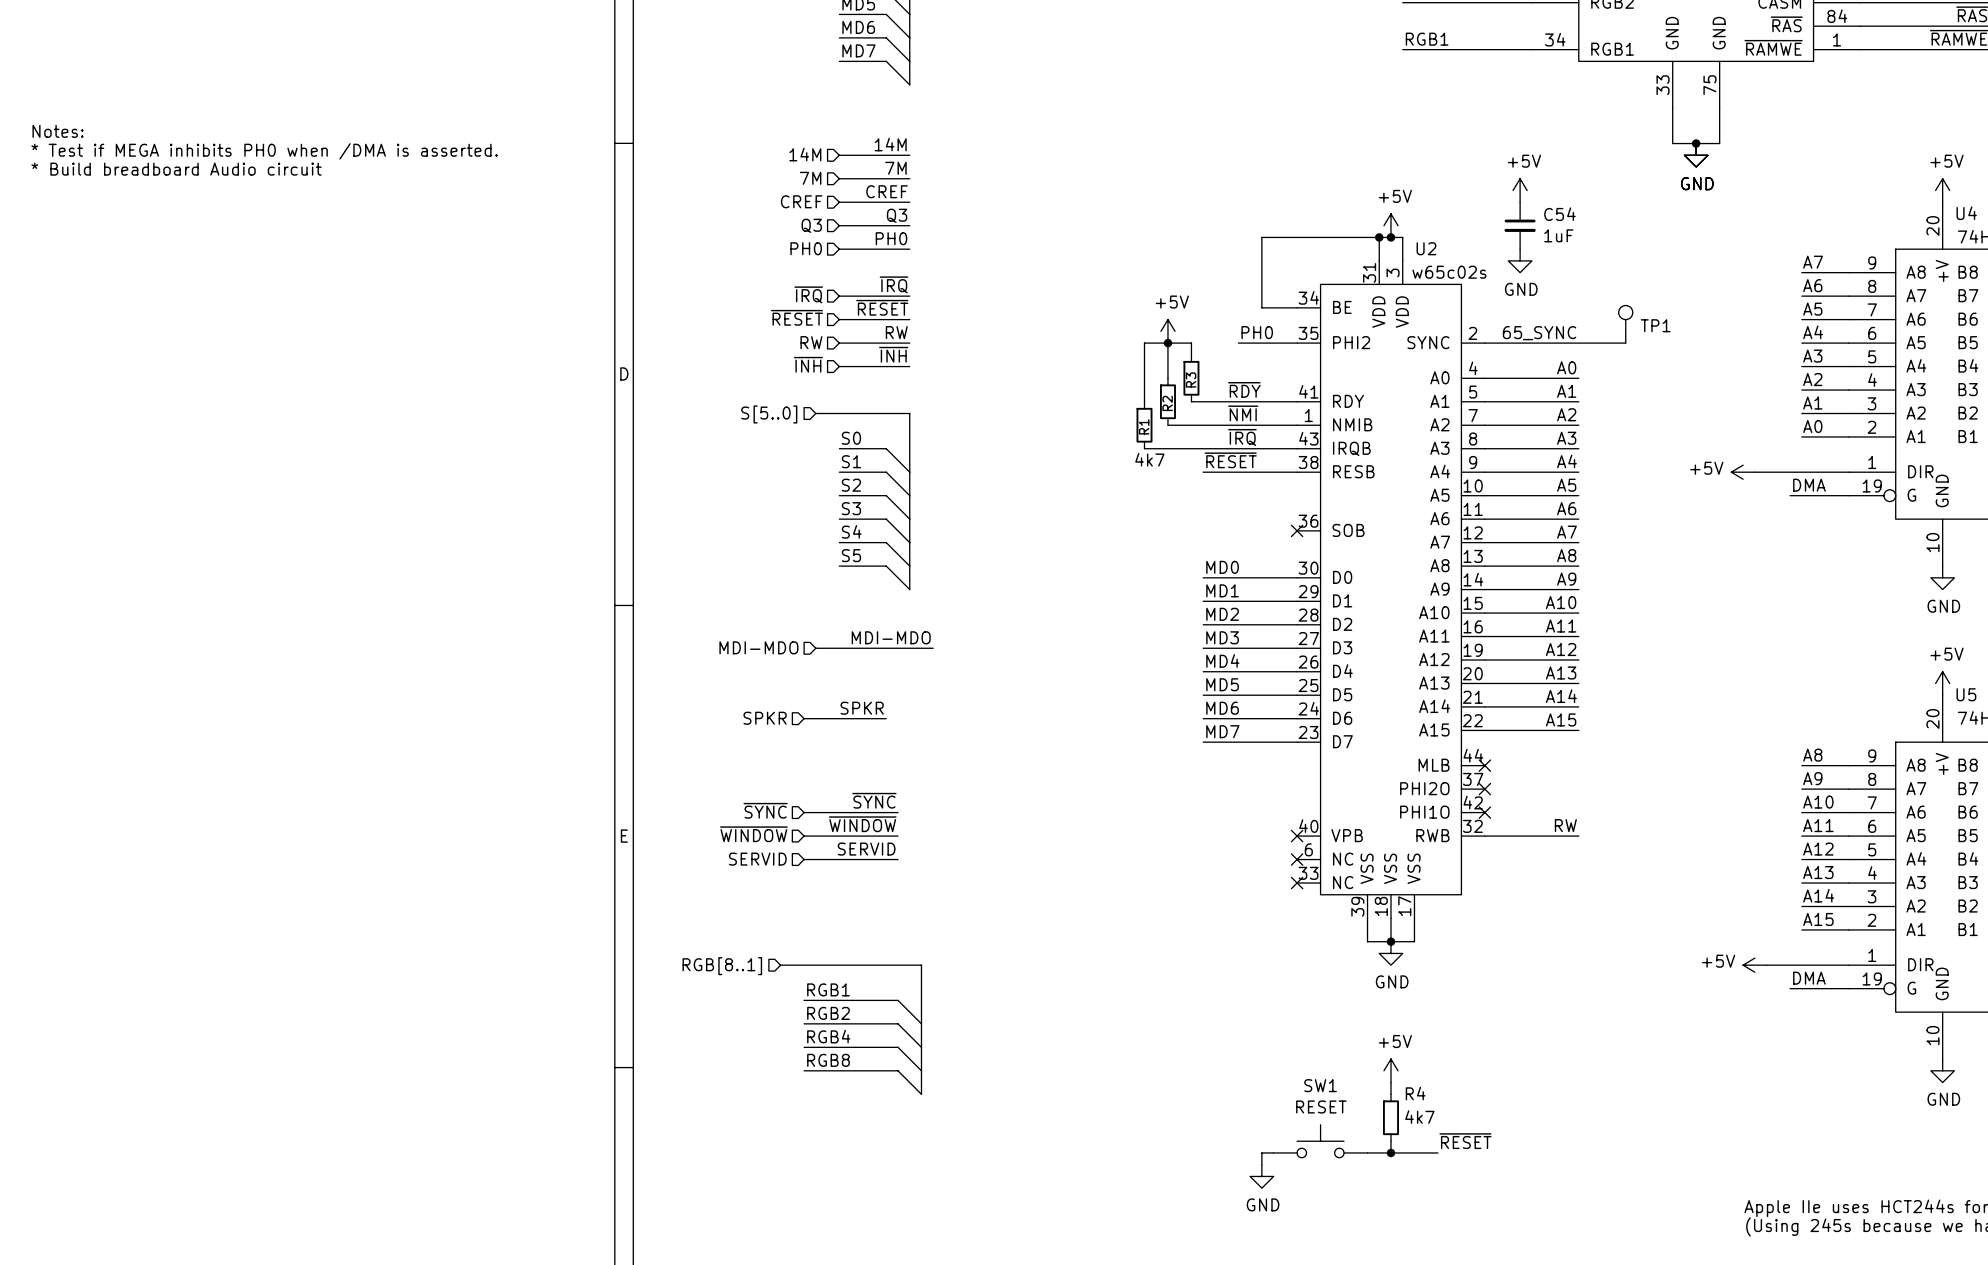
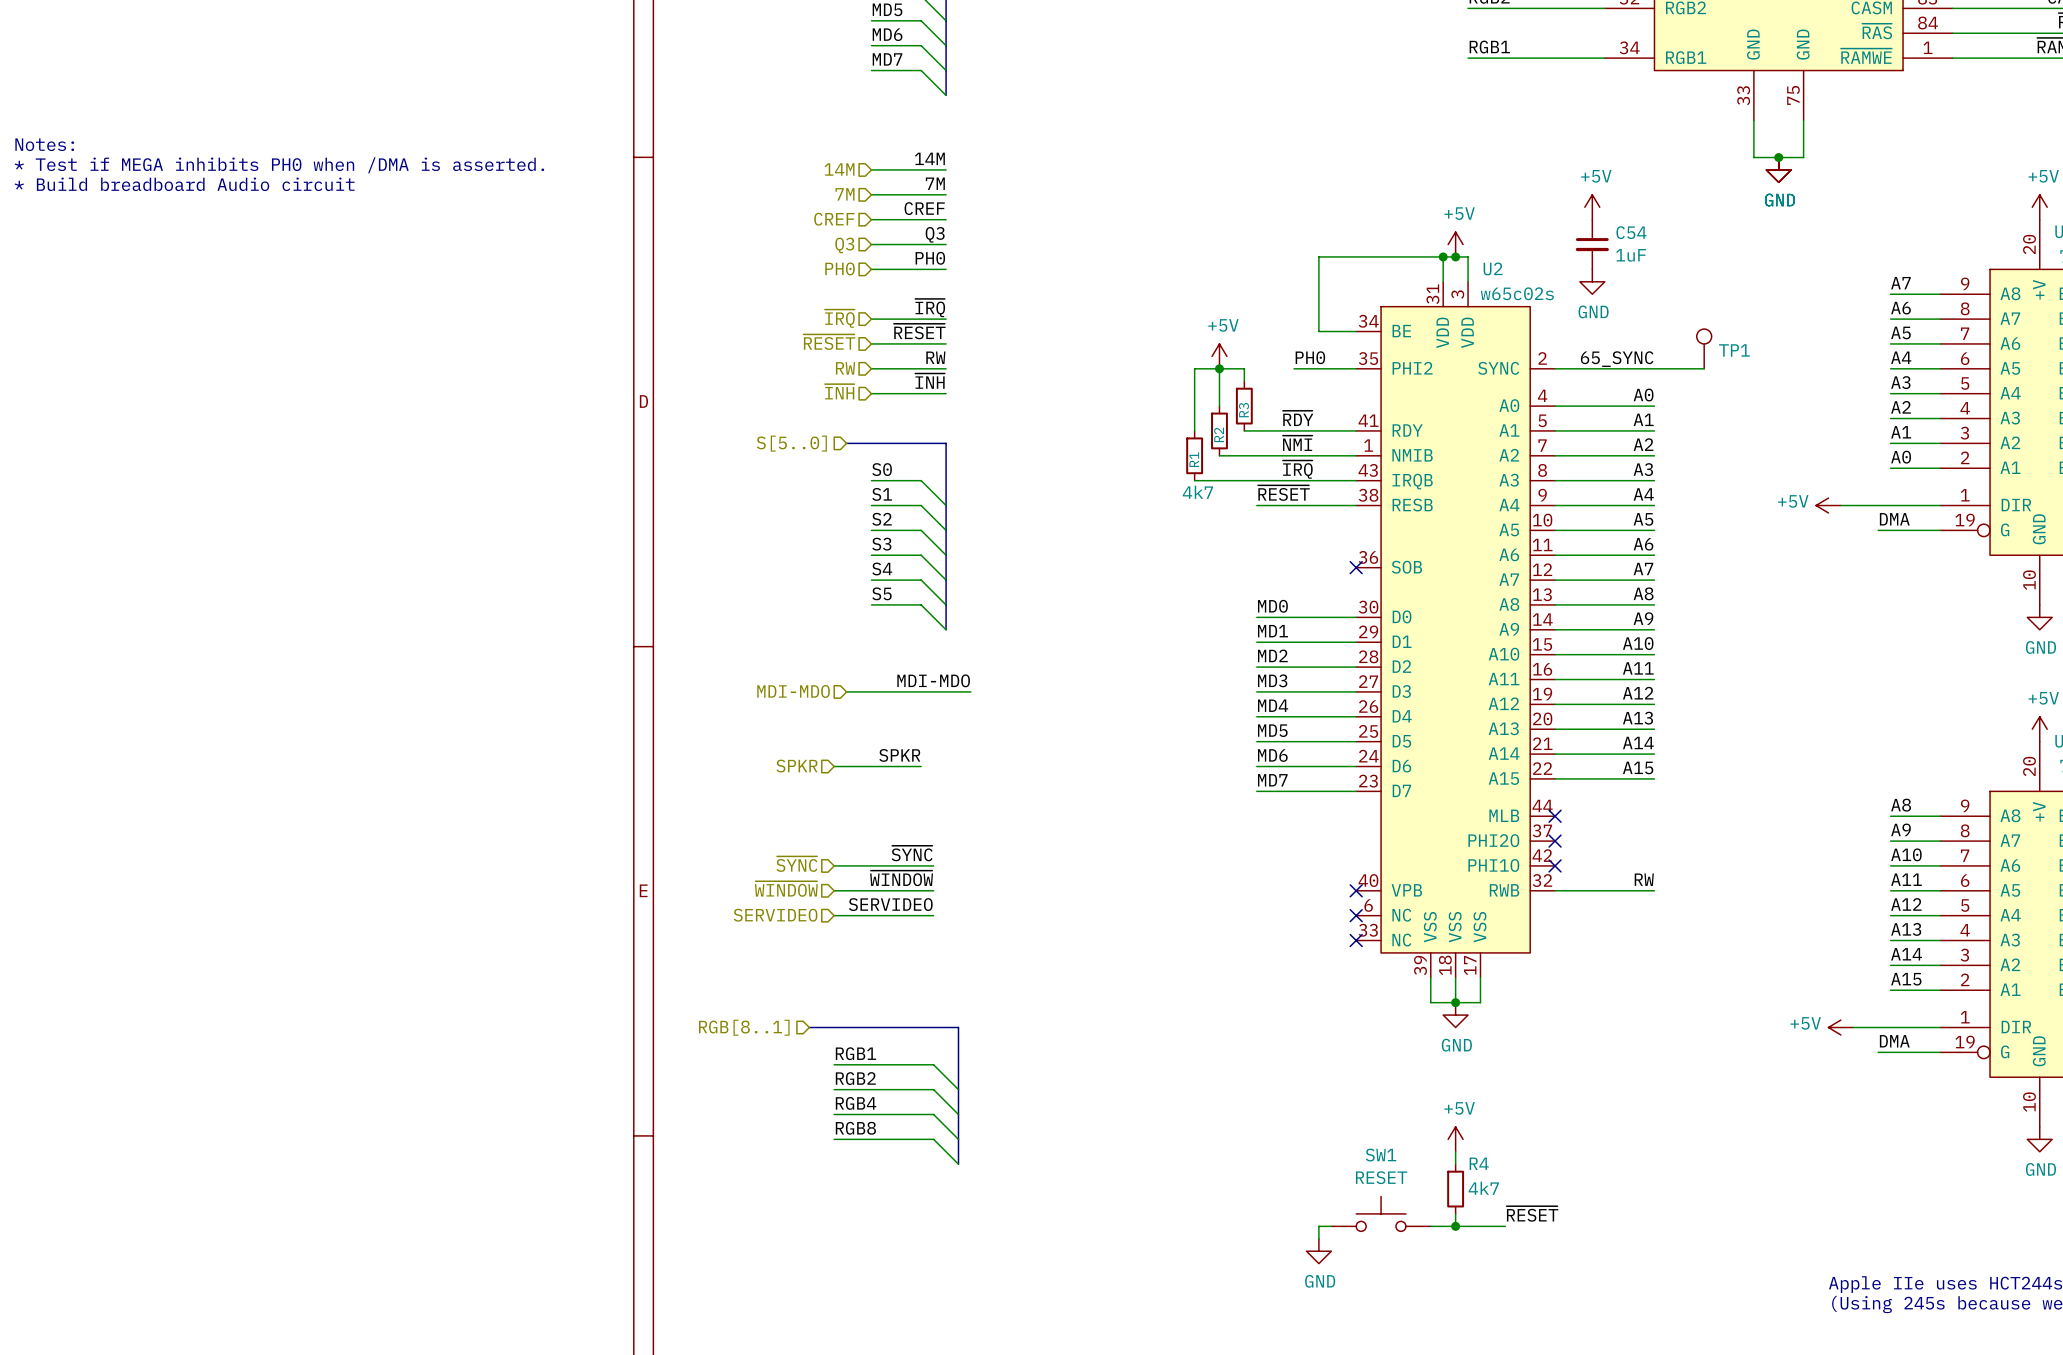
label: SERVID (866, 849) -> SERVIDEO (890, 904)
hierarchical label: SERVID (757, 859) -> SERVIDEO (775, 915)

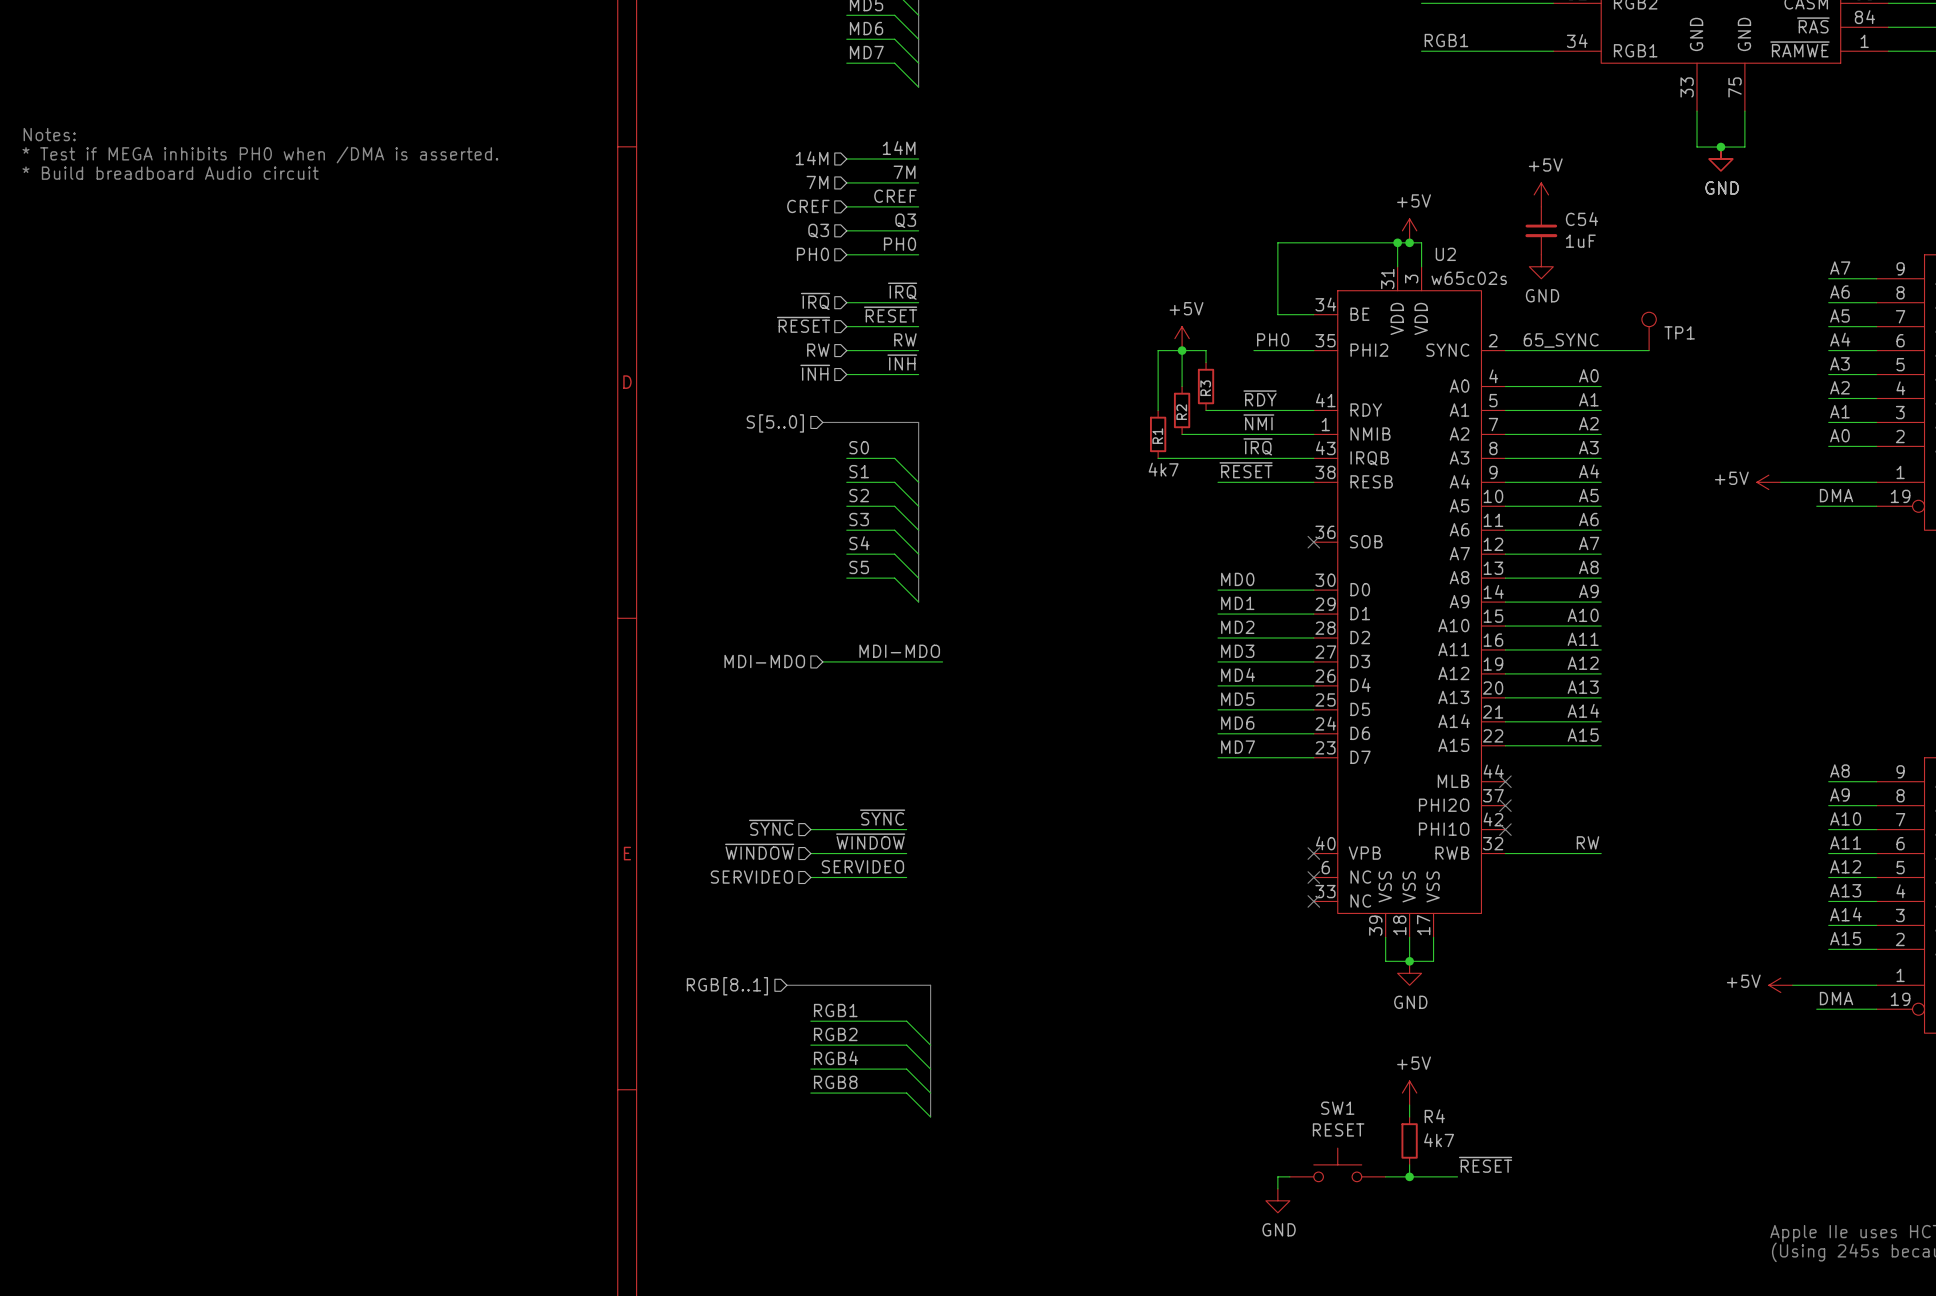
label: SPKR (899, 755) -> none
hierarchical label: SPKR (797, 766) -> none
wire: (834, 766) (921, 766) -> none

